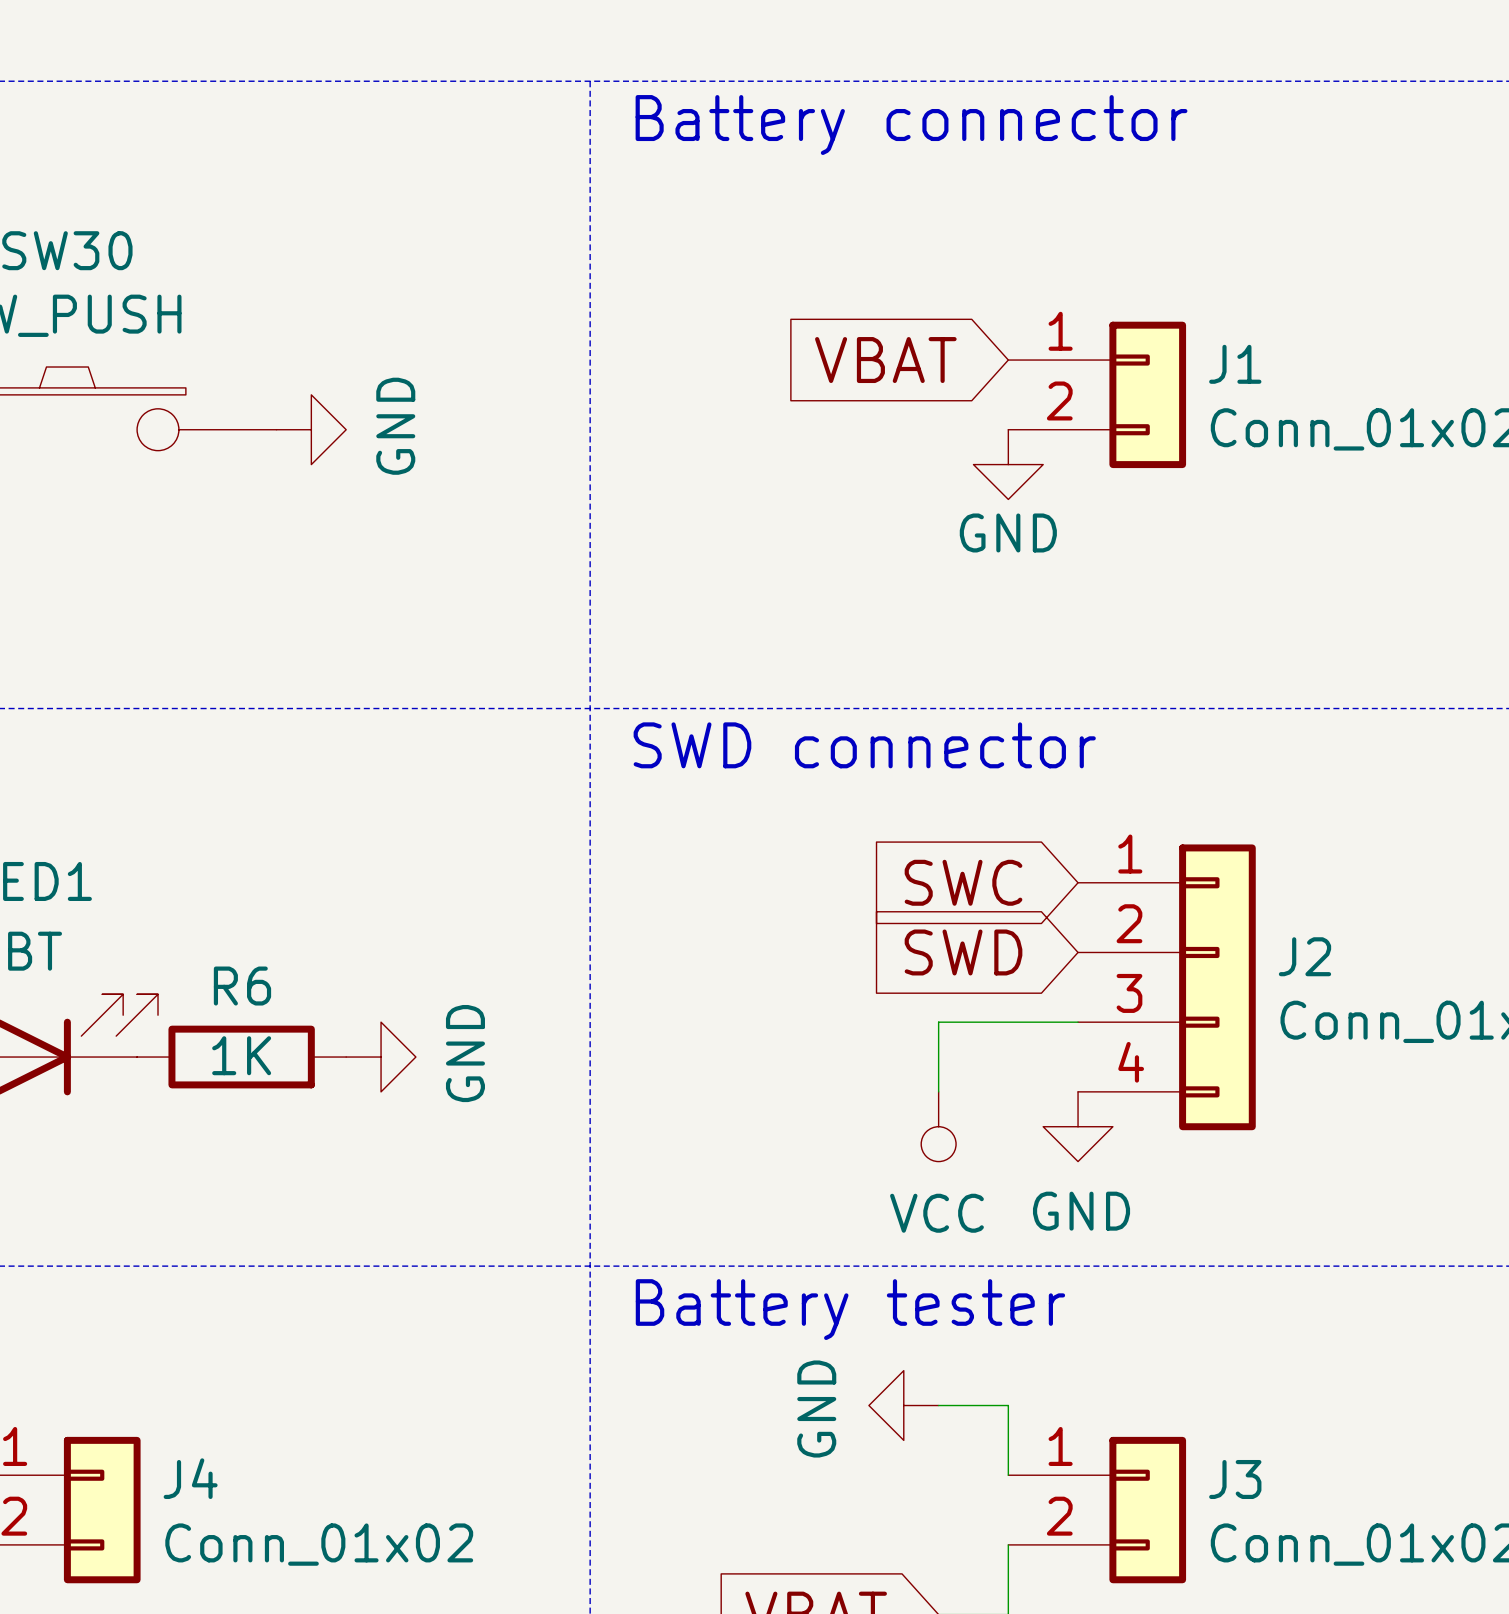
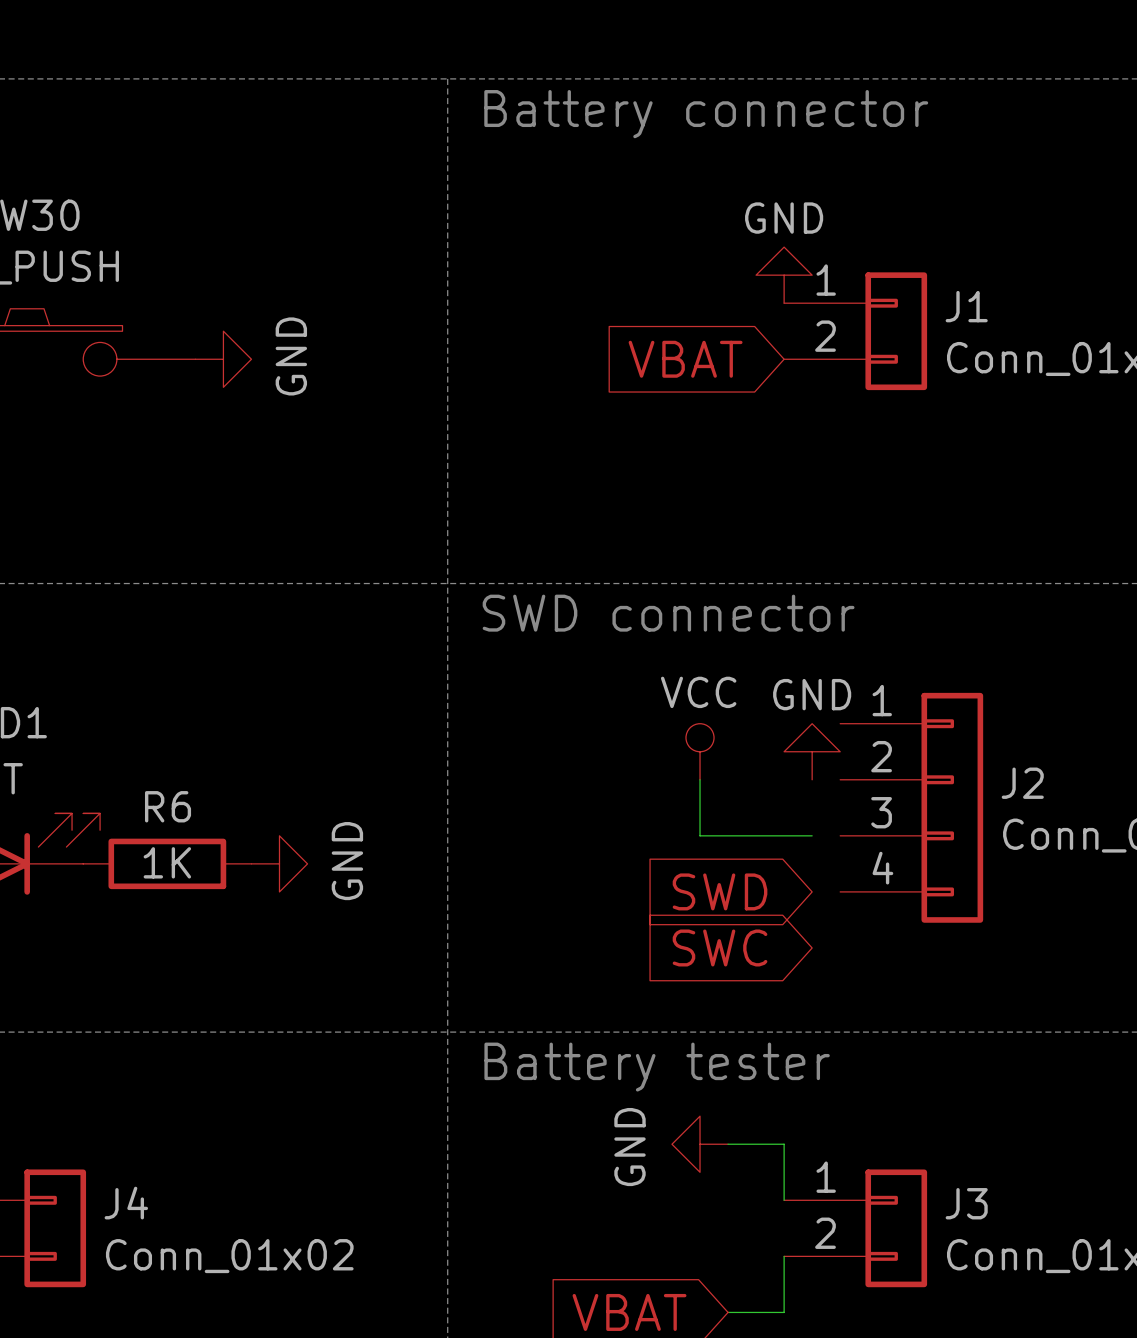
global label position: VBAT (885, 360) -> VBAT (685, 359)
power symbol rotation: 0° (1008, 464) -> 180° (784, 275)
power symbol position: GND (1008, 464) -> GND (784, 275)
global label position: SWC (963, 882) -> SWC (720, 947)
global label position: SWD (963, 952) -> SWD (720, 891)
wire: (938, 1022) (938, 1091) -> (728, 835) (700, 835) (700, 779)
wire: (1043, 1022) (1078, 1022) -> none
power symbol rotation: 0° (938, 1126) -> 180° (700, 751)
power symbol position: VCC (938, 1126) -> VCC (700, 751)
power symbol rotation: 0° (1078, 1126) -> 180° (812, 751)
power symbol position: GND (1078, 1126) -> GND (812, 751)

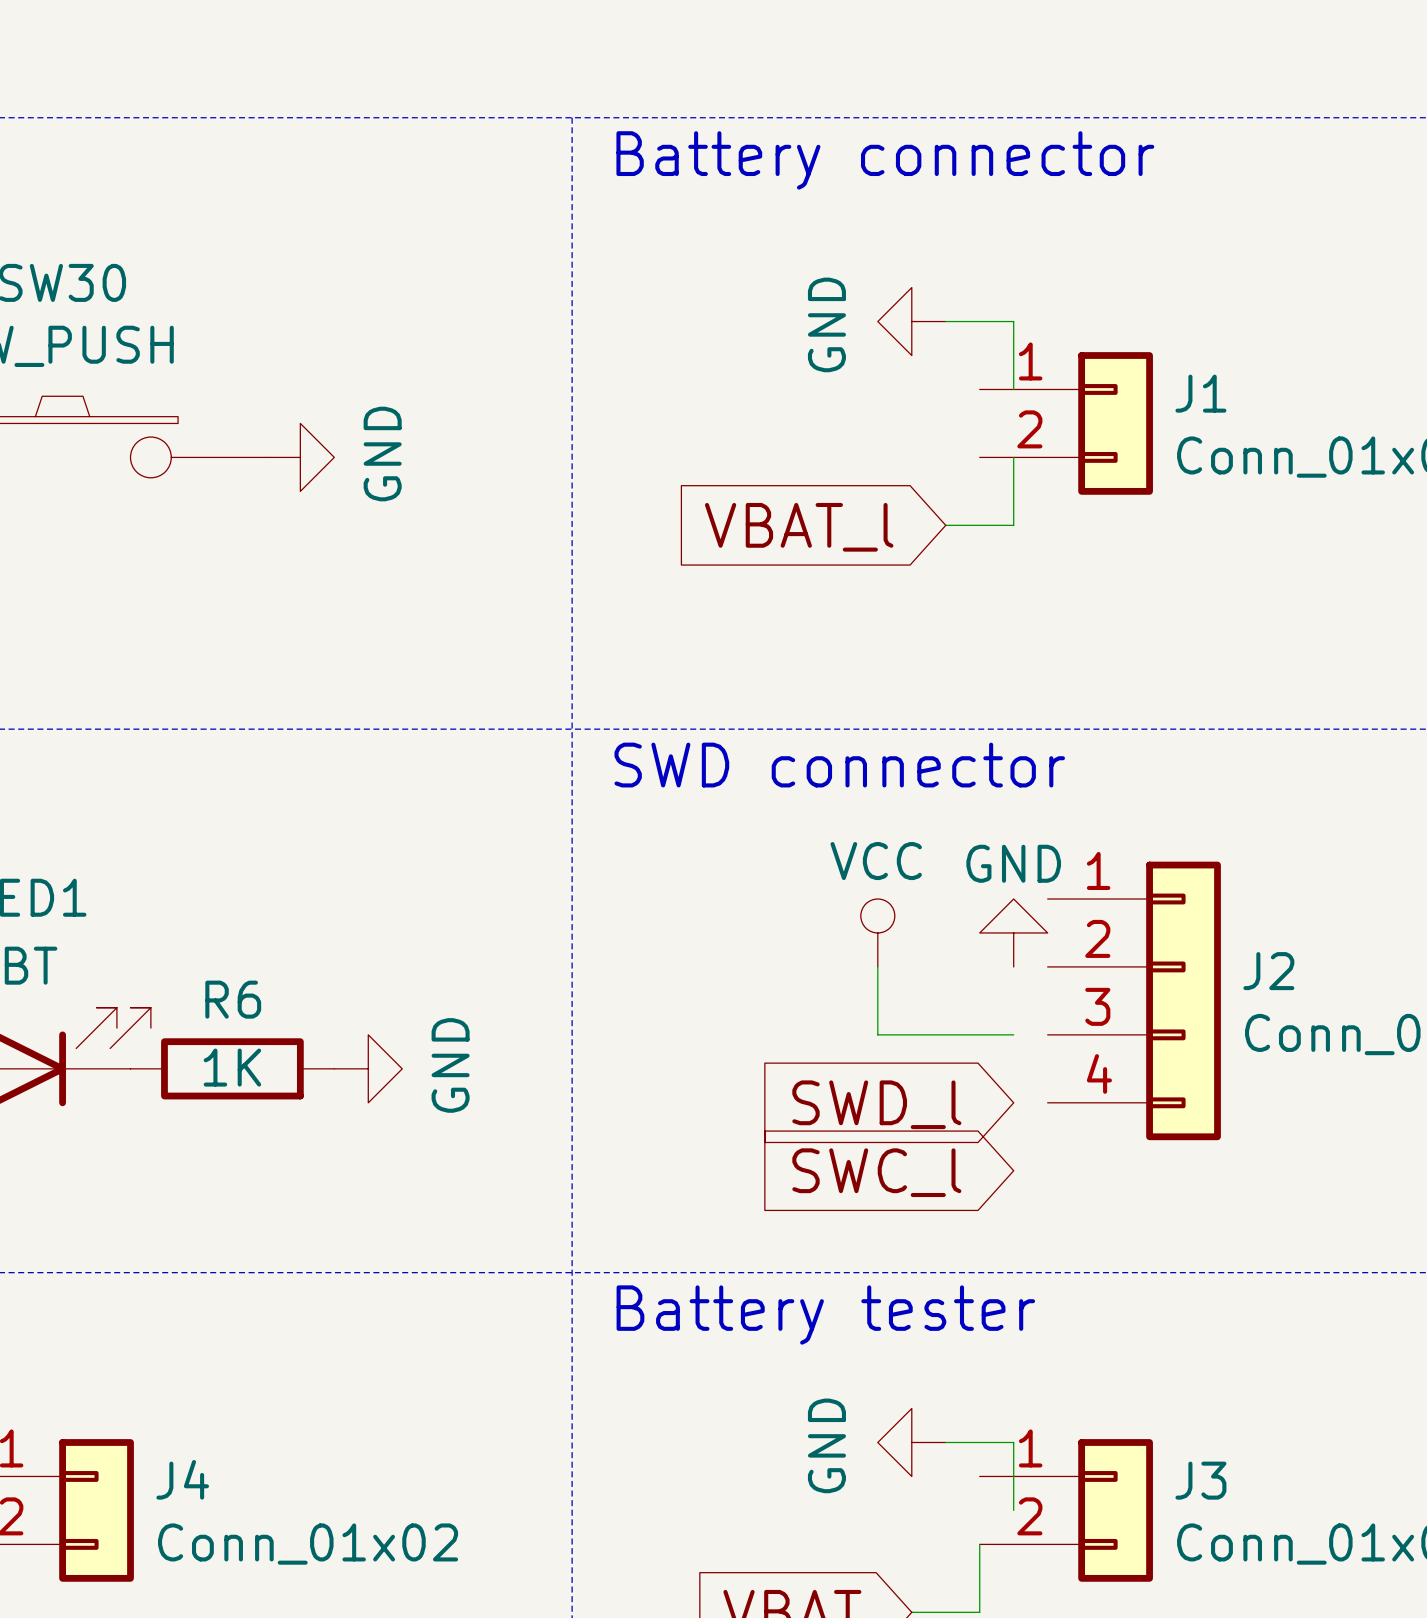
wire: none -> (945, 321) (1013, 321) (1013, 389)
power symbol rotation: 0° (784, 275) -> 90° counterclockwise (911, 321)
power symbol position: GND (784, 275) -> GND (911, 321)
global label: VBAT (685, 359) -> VBAT_l (799, 527)
wire: none -> (1013, 457) (1013, 525) (945, 525)
global label: SWD (720, 891) -> SWD_l (876, 1104)
global label: SWC (720, 947) -> SWC_l (876, 1172)
power symbol position: GND (700, 1144) -> GND (911, 1442)
wire: (728, 1144) (784, 1144) (784, 1200) -> (945, 1442) (1013, 1442) (1013, 1510)

